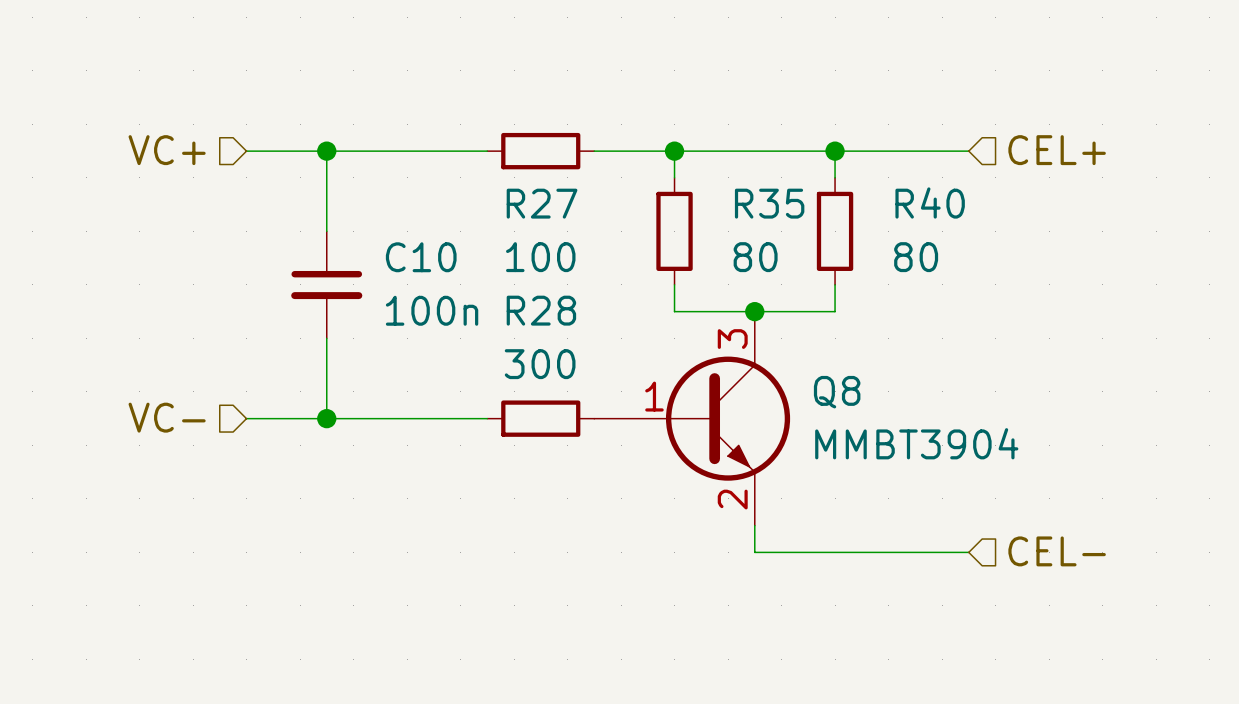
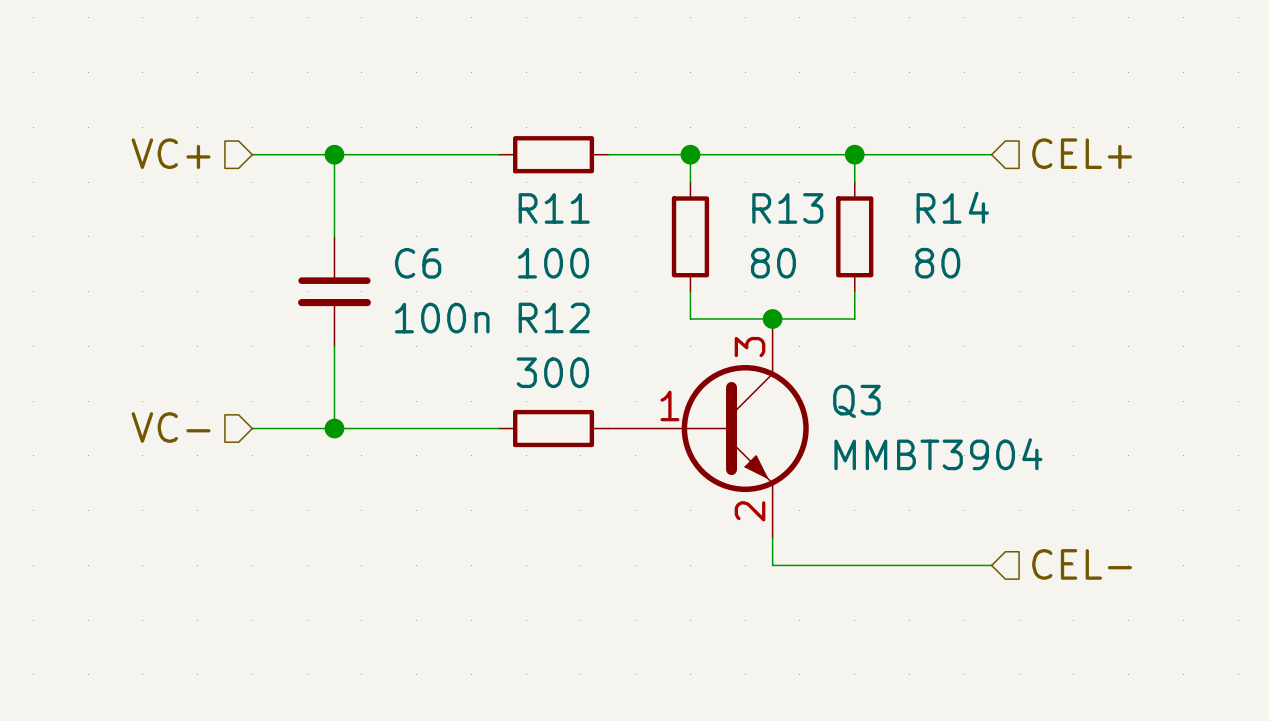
R40 name: R40 (930, 202) -> R14 (952, 207)
R27 name: R27 (542, 203) -> R11 (554, 208)
R35 name: R35 (769, 203) -> R13 (787, 208)
C10 name: C10 (421, 257) -> C6 (418, 263)
R28 name: R28 (541, 310) -> R12 (554, 317)
Q8 name: Q8 (837, 392) -> Q3 (856, 401)

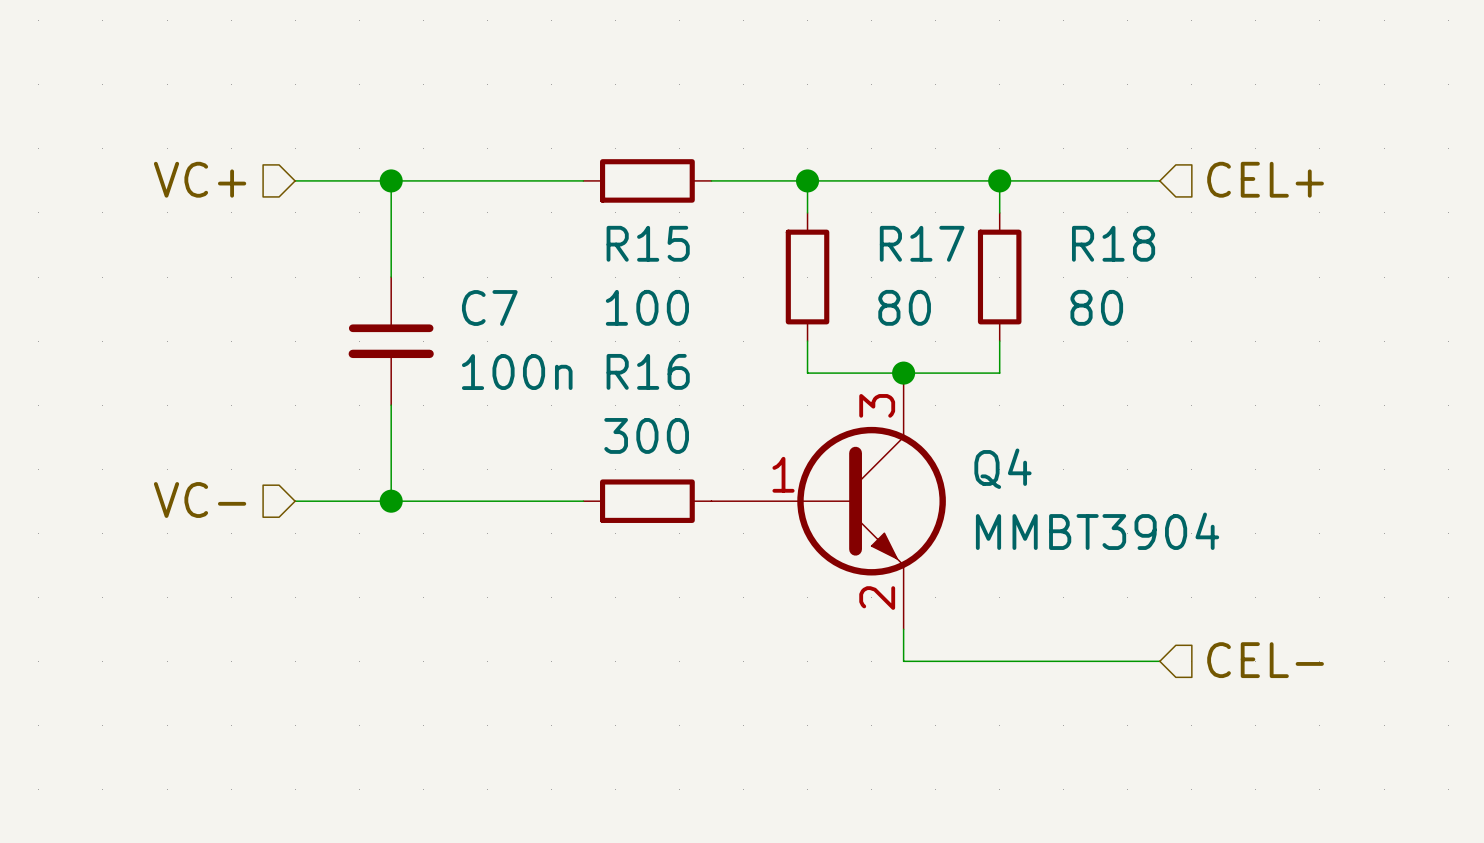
R14 name: R14 (952, 207) -> R18 (1113, 243)
R11 name: R11 (554, 208) -> R15 (648, 243)
R13 name: R13 (787, 208) -> R17 (922, 243)
C6 name: C6 (418, 263) -> C7 (489, 307)
R12 name: R12 (554, 317) -> R16 (648, 371)
Q3 name: Q3 (856, 401) -> Q4 (1002, 468)

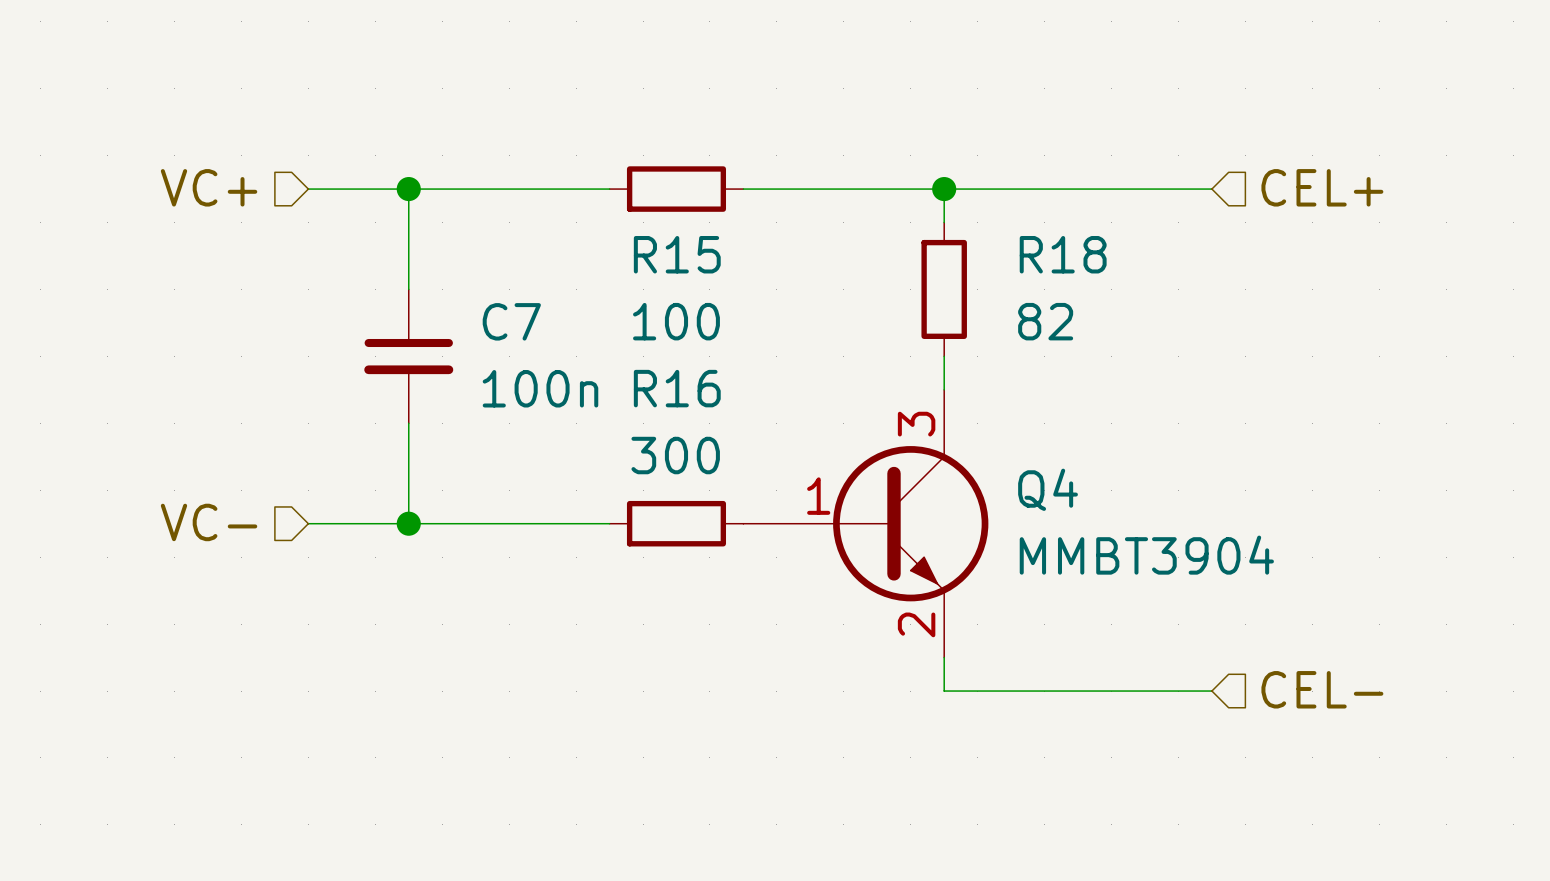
wire: (807, 180) (807, 212) -> (944, 189) (944, 222)
junction: (807, 180) -> none
junction: none -> (944, 189)
wire: (999, 180) (999, 212) -> (944, 356) (944, 389)
junction: (999, 180) -> none
R17: 80 (807, 277) -> none
R18 position: (999, 277) -> (944, 289)
R18 value: 80 (1096, 307) -> 82 (1045, 321)
wire: (807, 341) (807, 373) (999, 373) (999, 341) -> none
junction: (903, 373) -> none

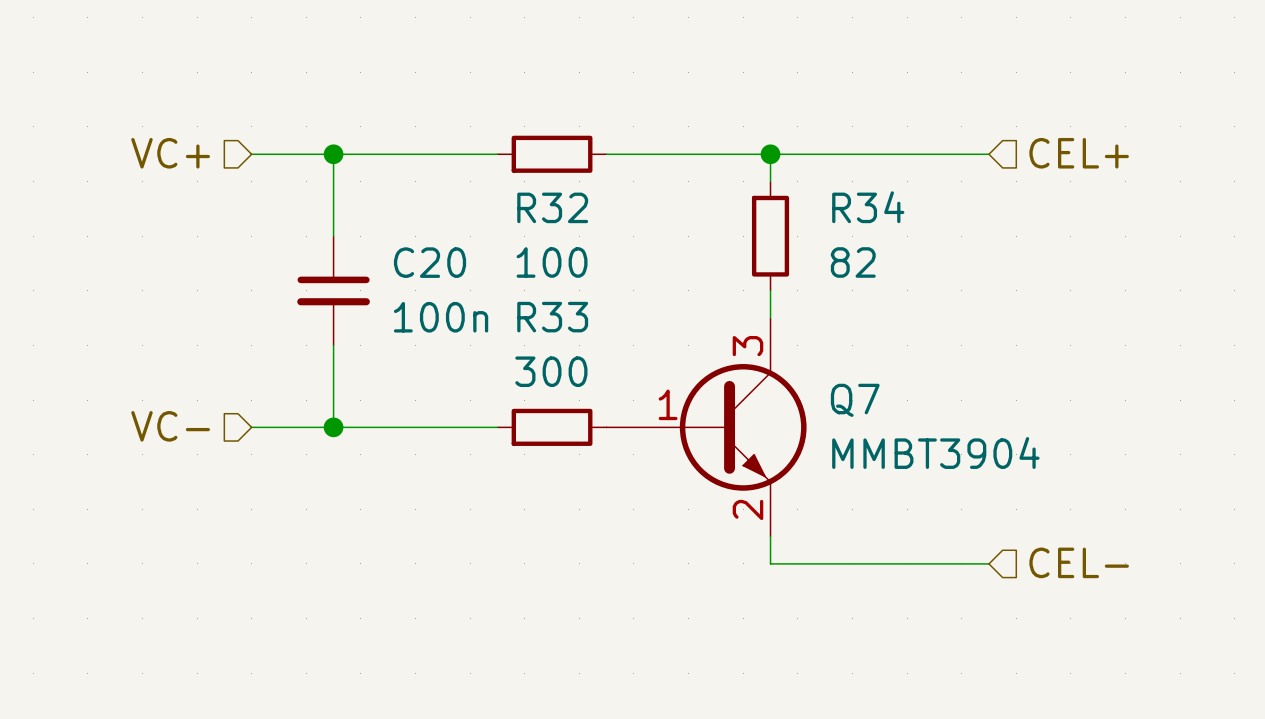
R15 name: R15 (677, 254) -> R32 (552, 207)
R18 name: R18 (1063, 254) -> R34 (868, 207)
C7 name: C7 (511, 321) -> C20 (430, 262)
R16 name: R16 (677, 388) -> R33 (552, 317)
Q4 name: Q4 (1048, 489) -> Q7 (855, 400)

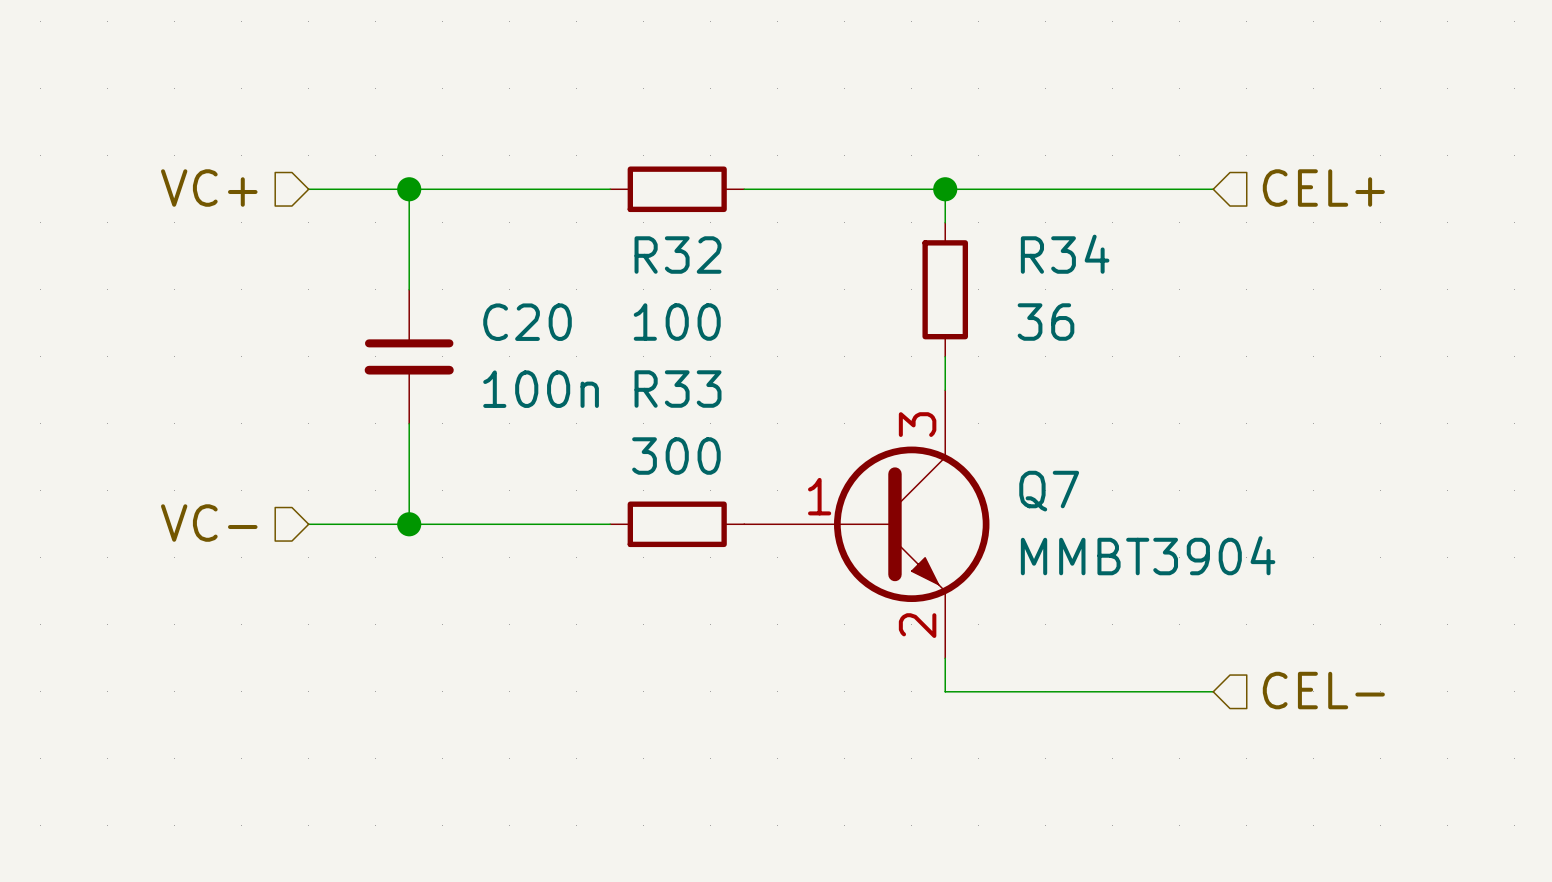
R34 value: 82 (853, 262) -> 36 (1045, 322)

